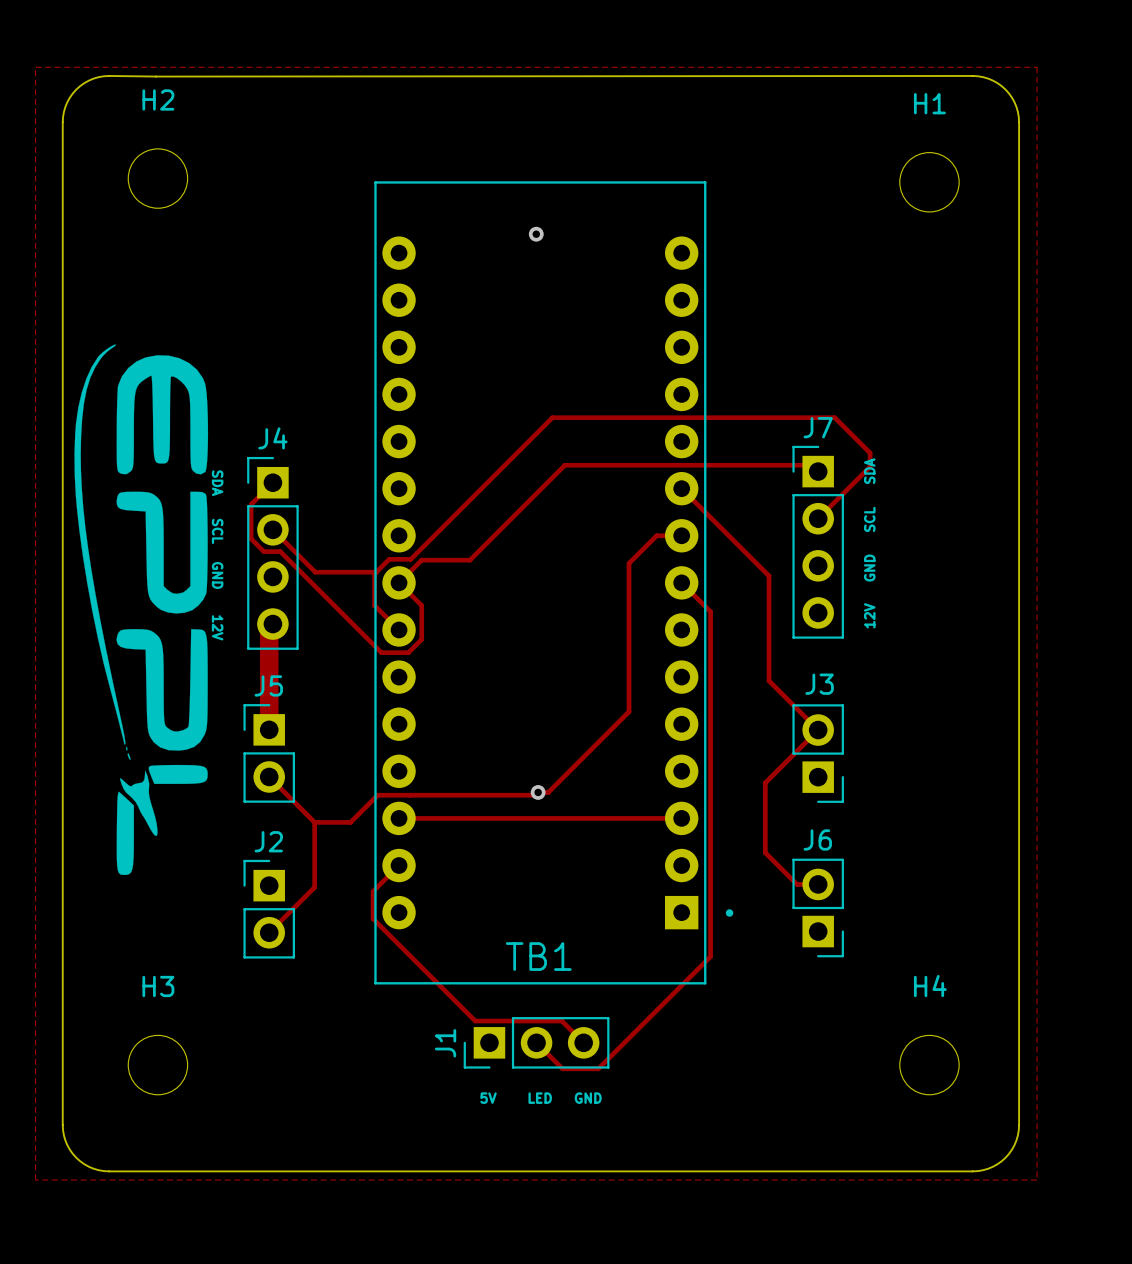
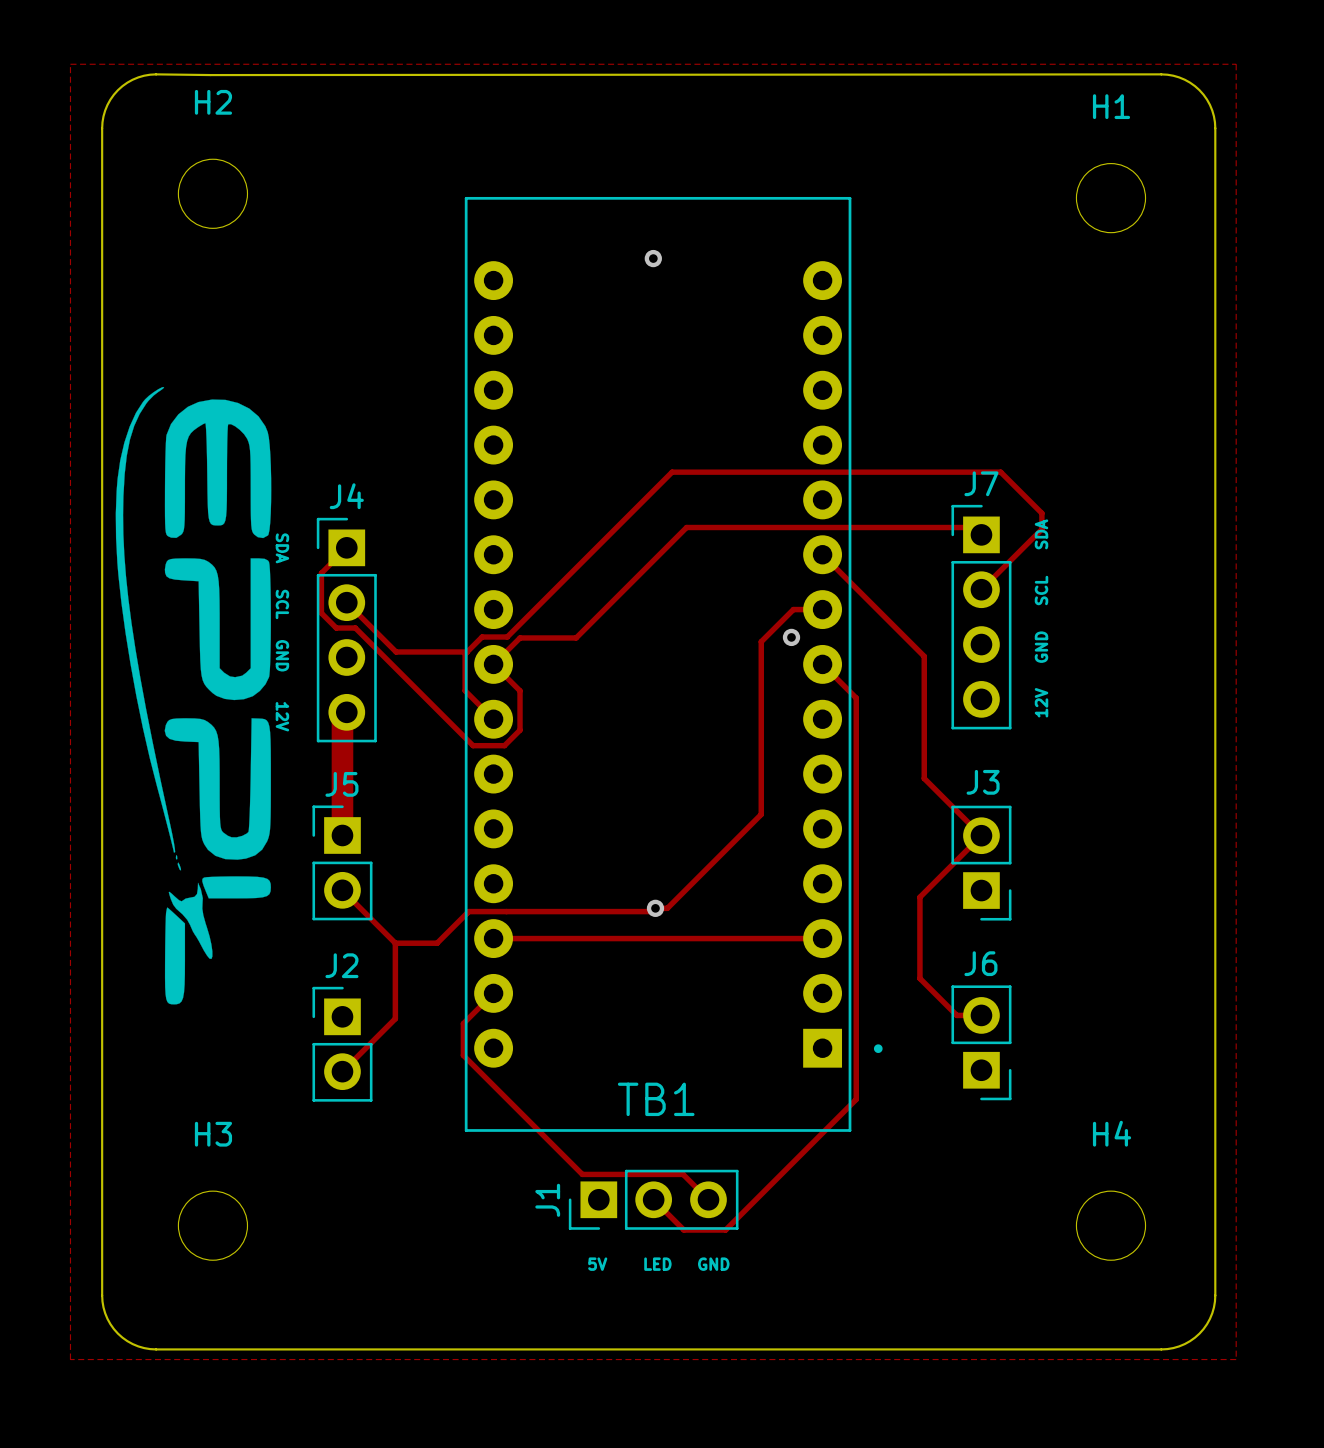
via: none -> (791, 637)

